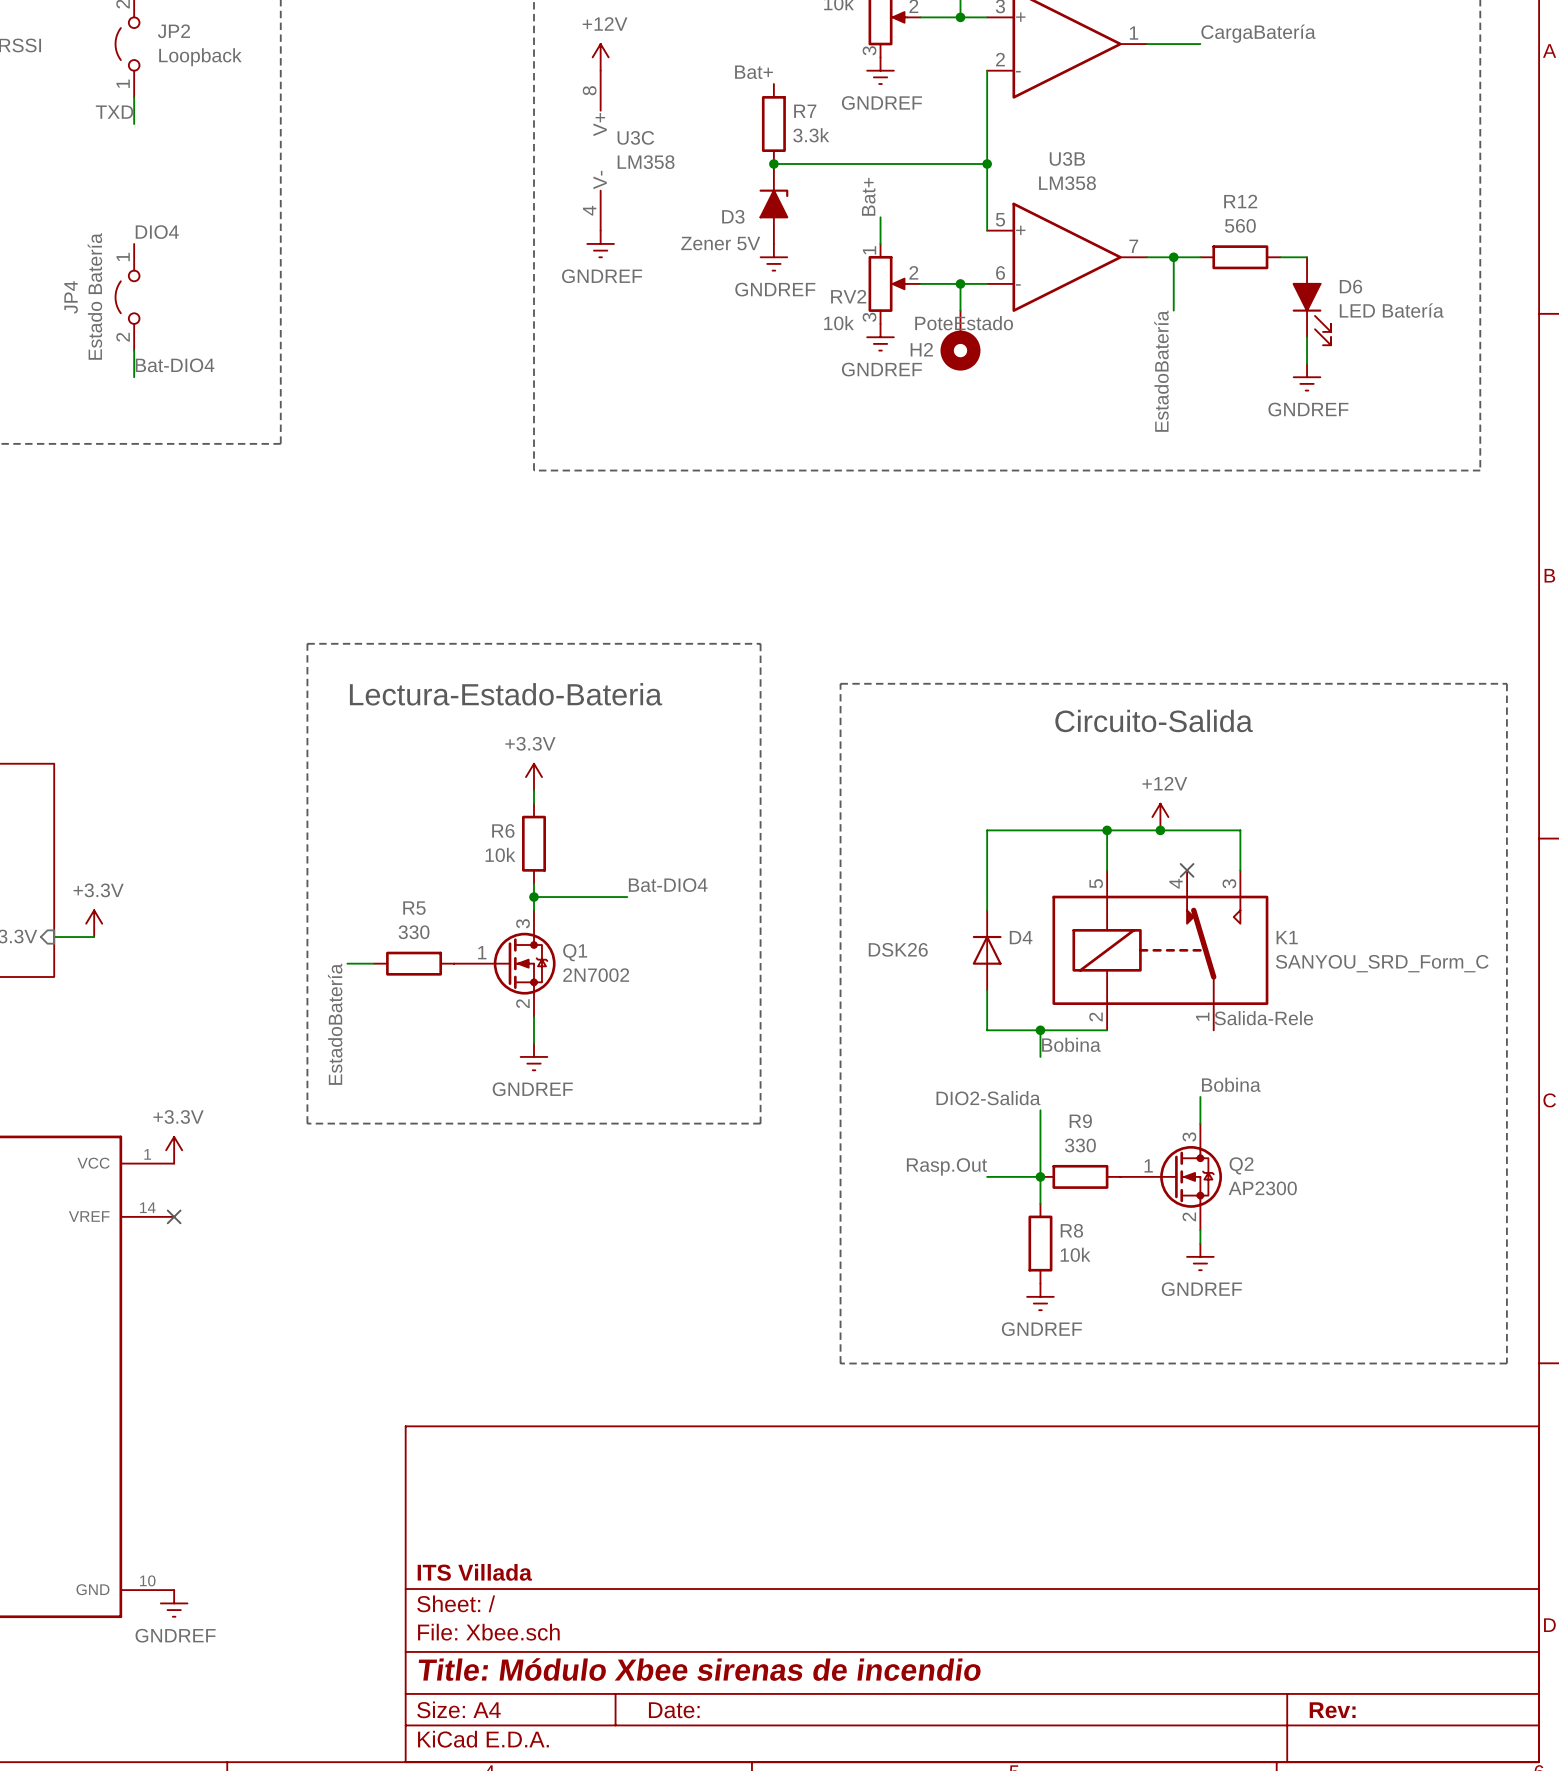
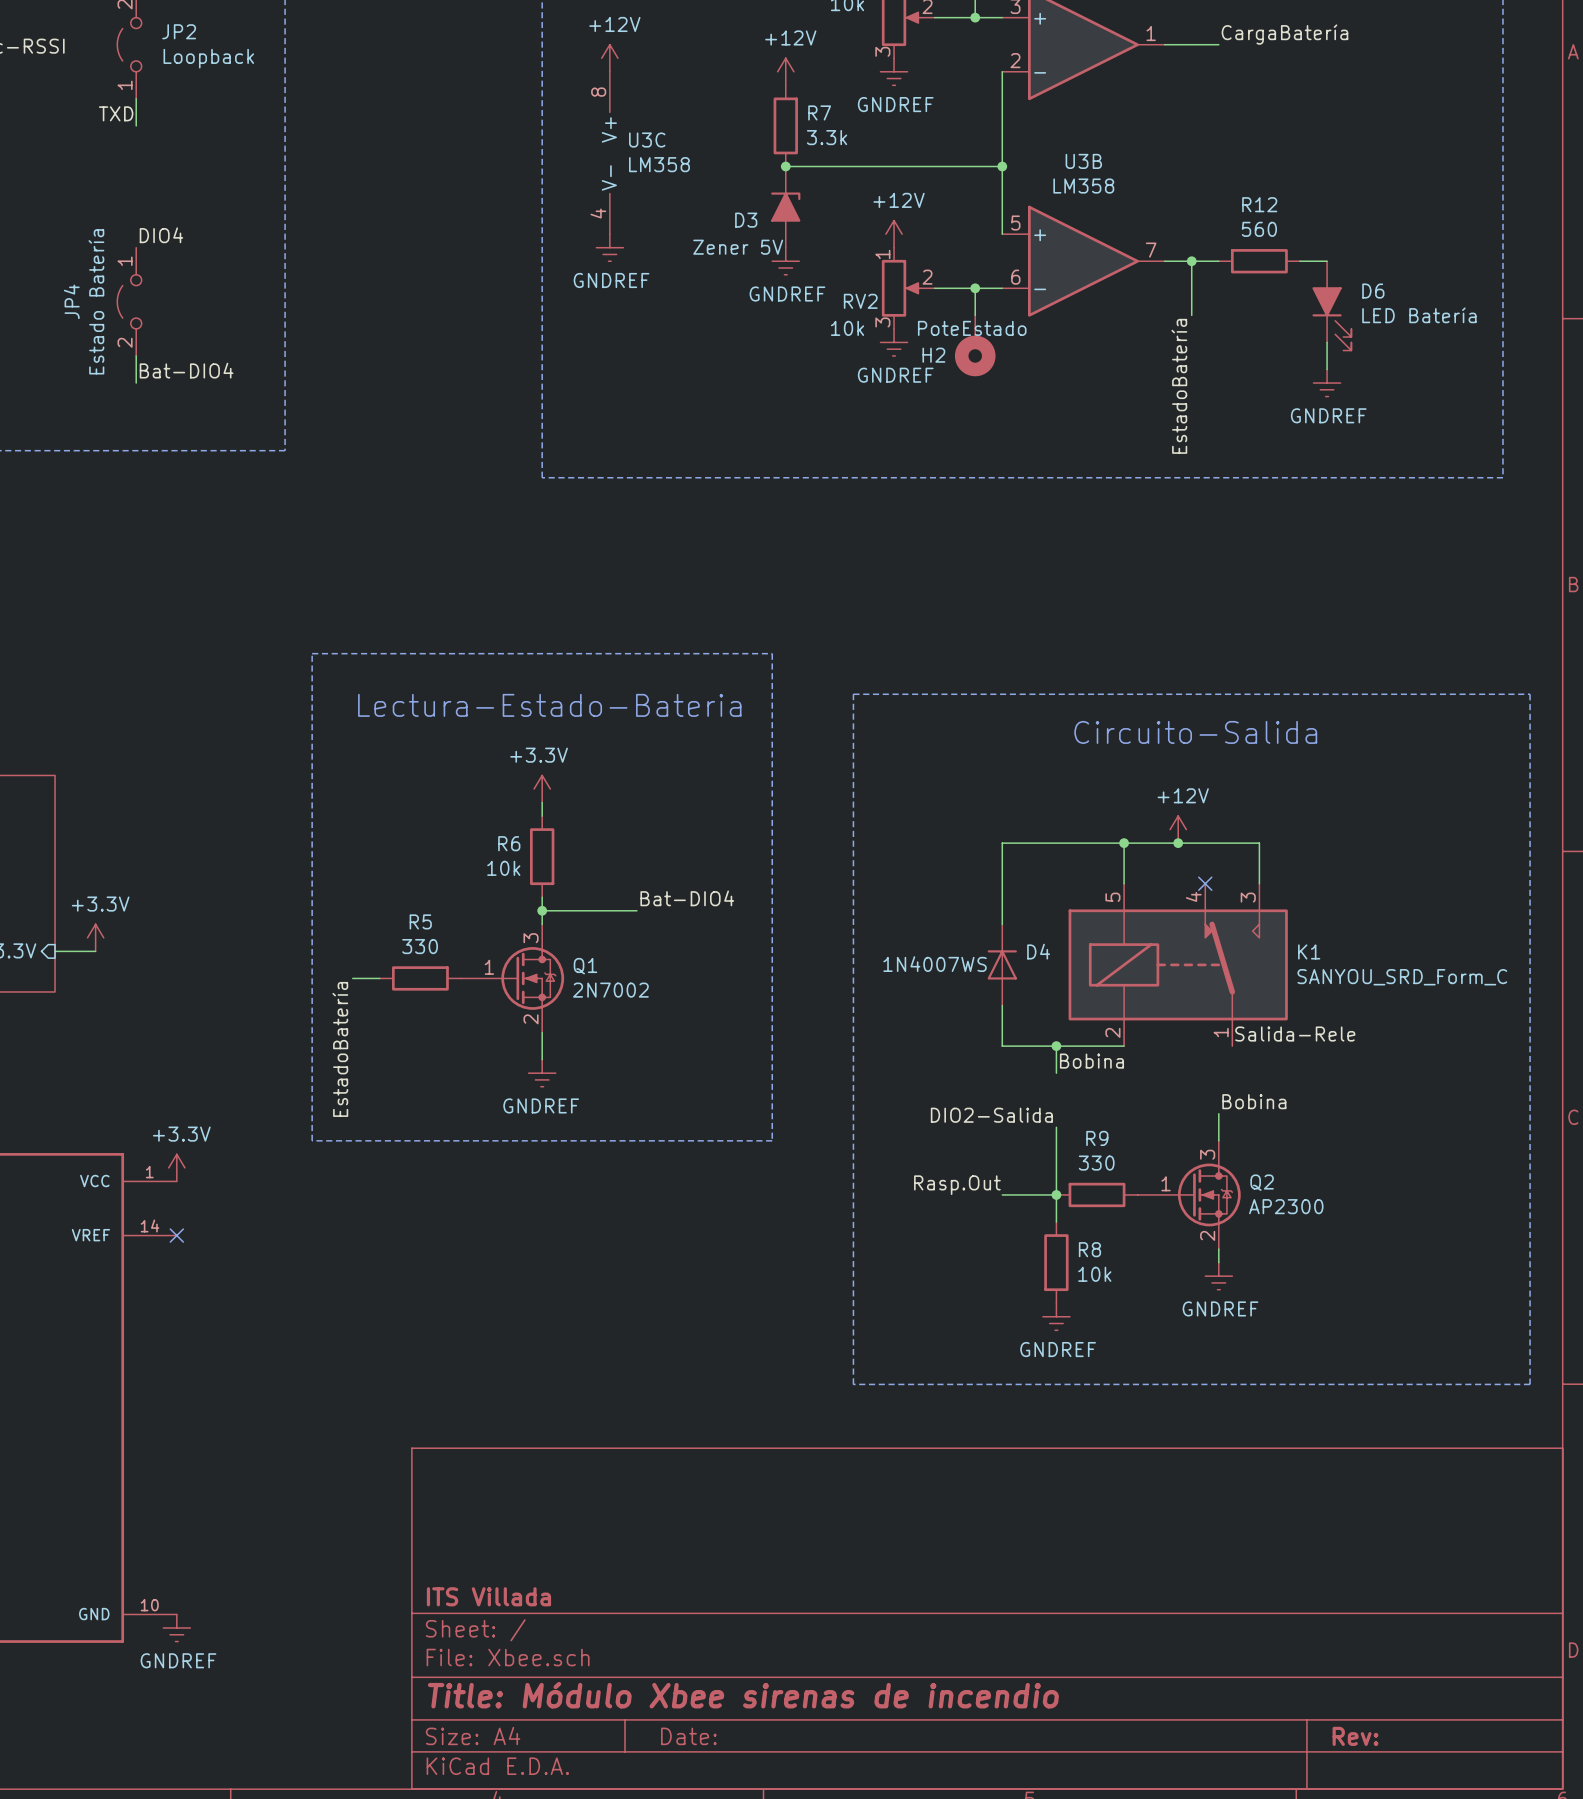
power symbol: none -> +12V (785, 71)
label: Bat+ (754, 72) -> none
label: Bat+ (868, 196) -> none
power symbol: none -> +12V (894, 234)
D4 value: DSK26 (898, 949) -> 1N4007WS (935, 964)

